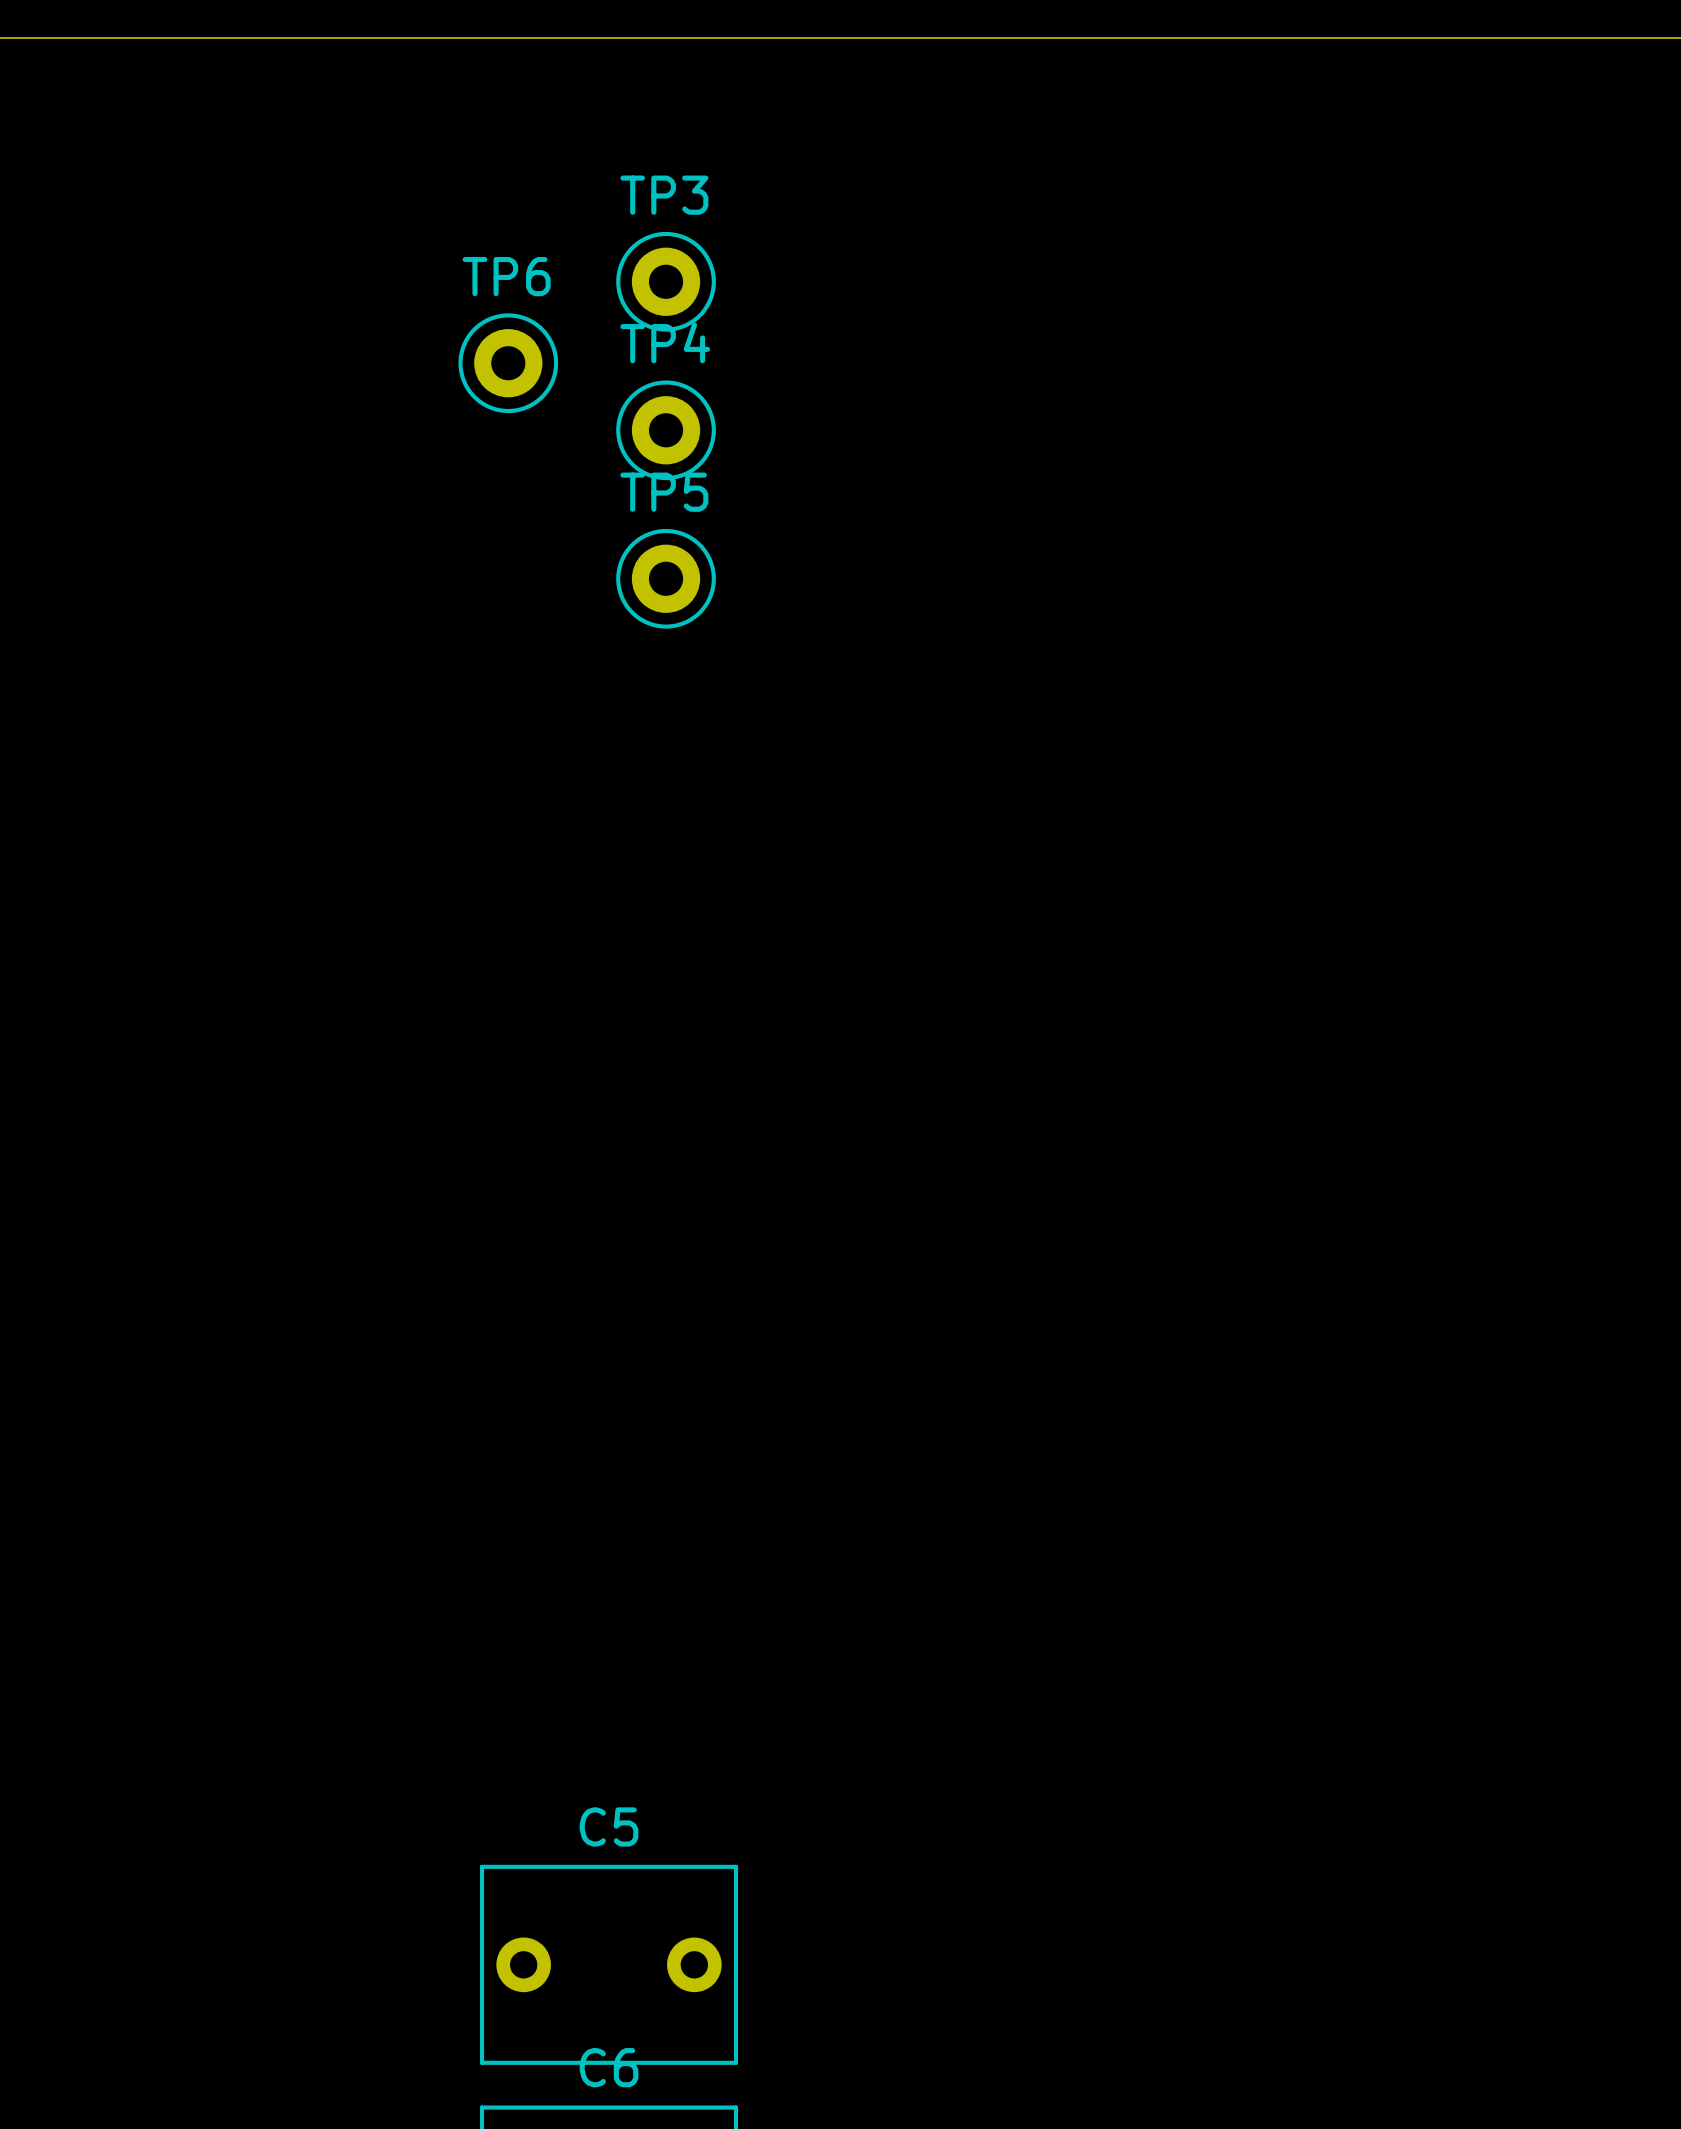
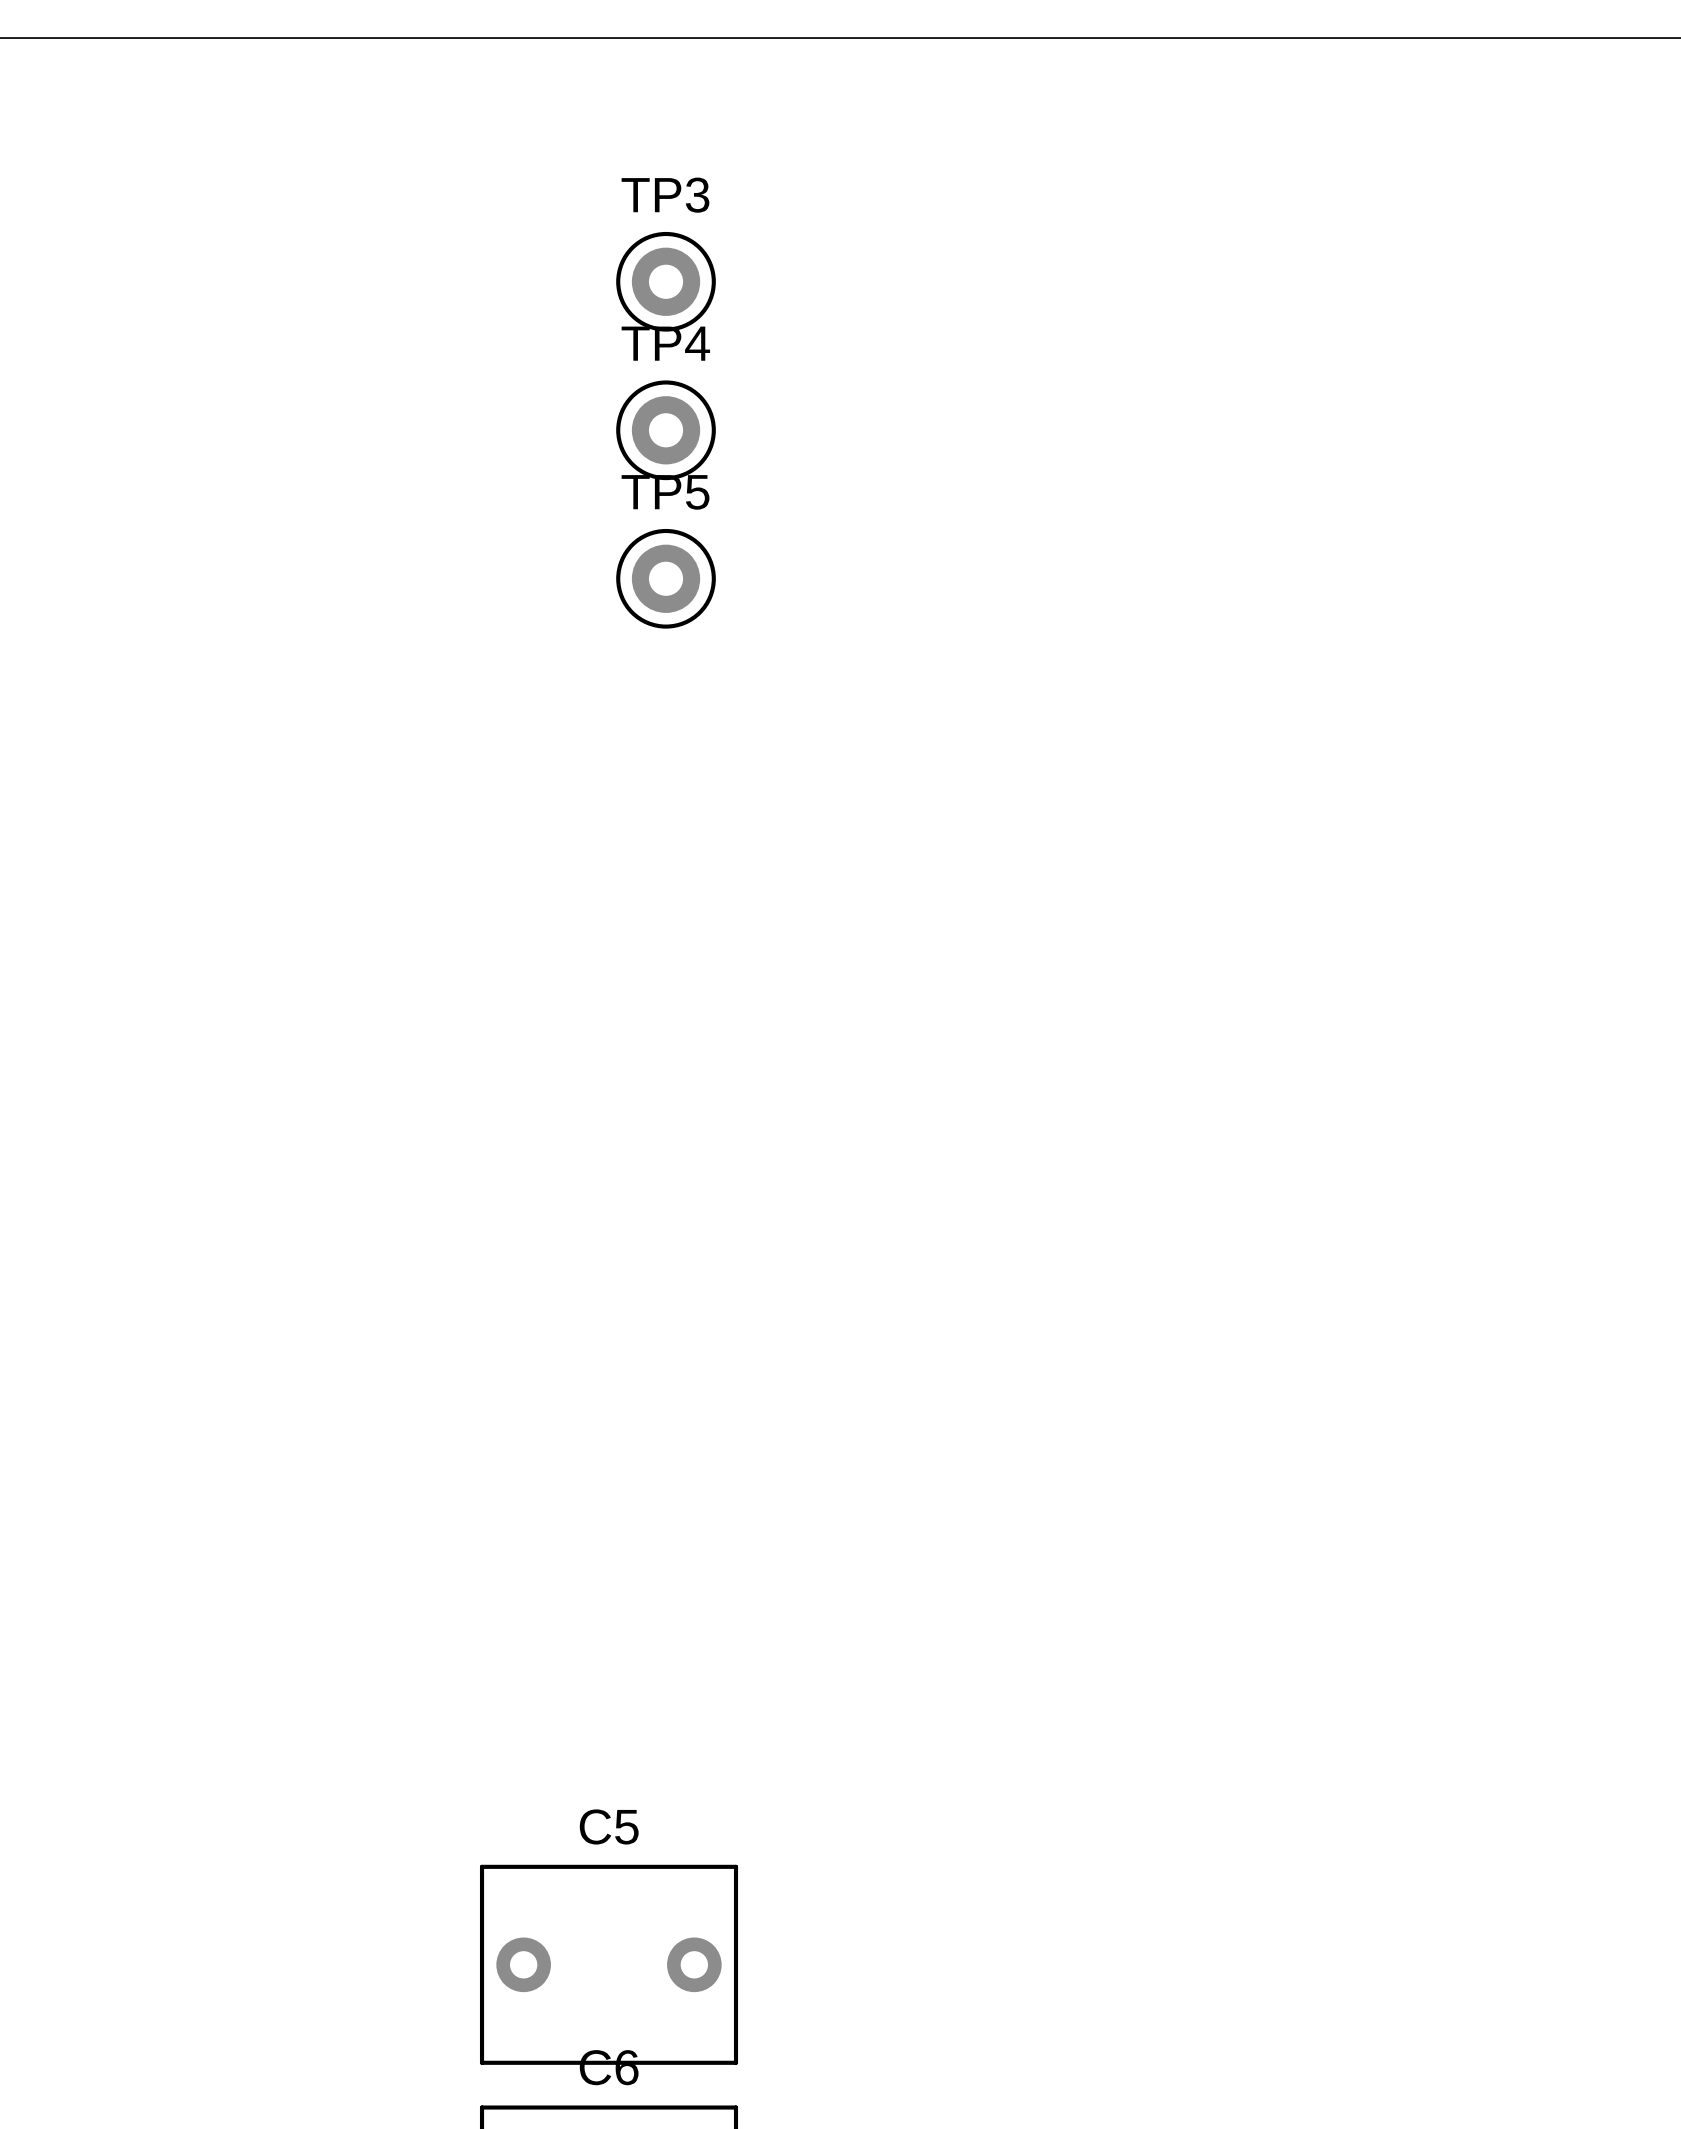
TP6: (508, 363) -> none

